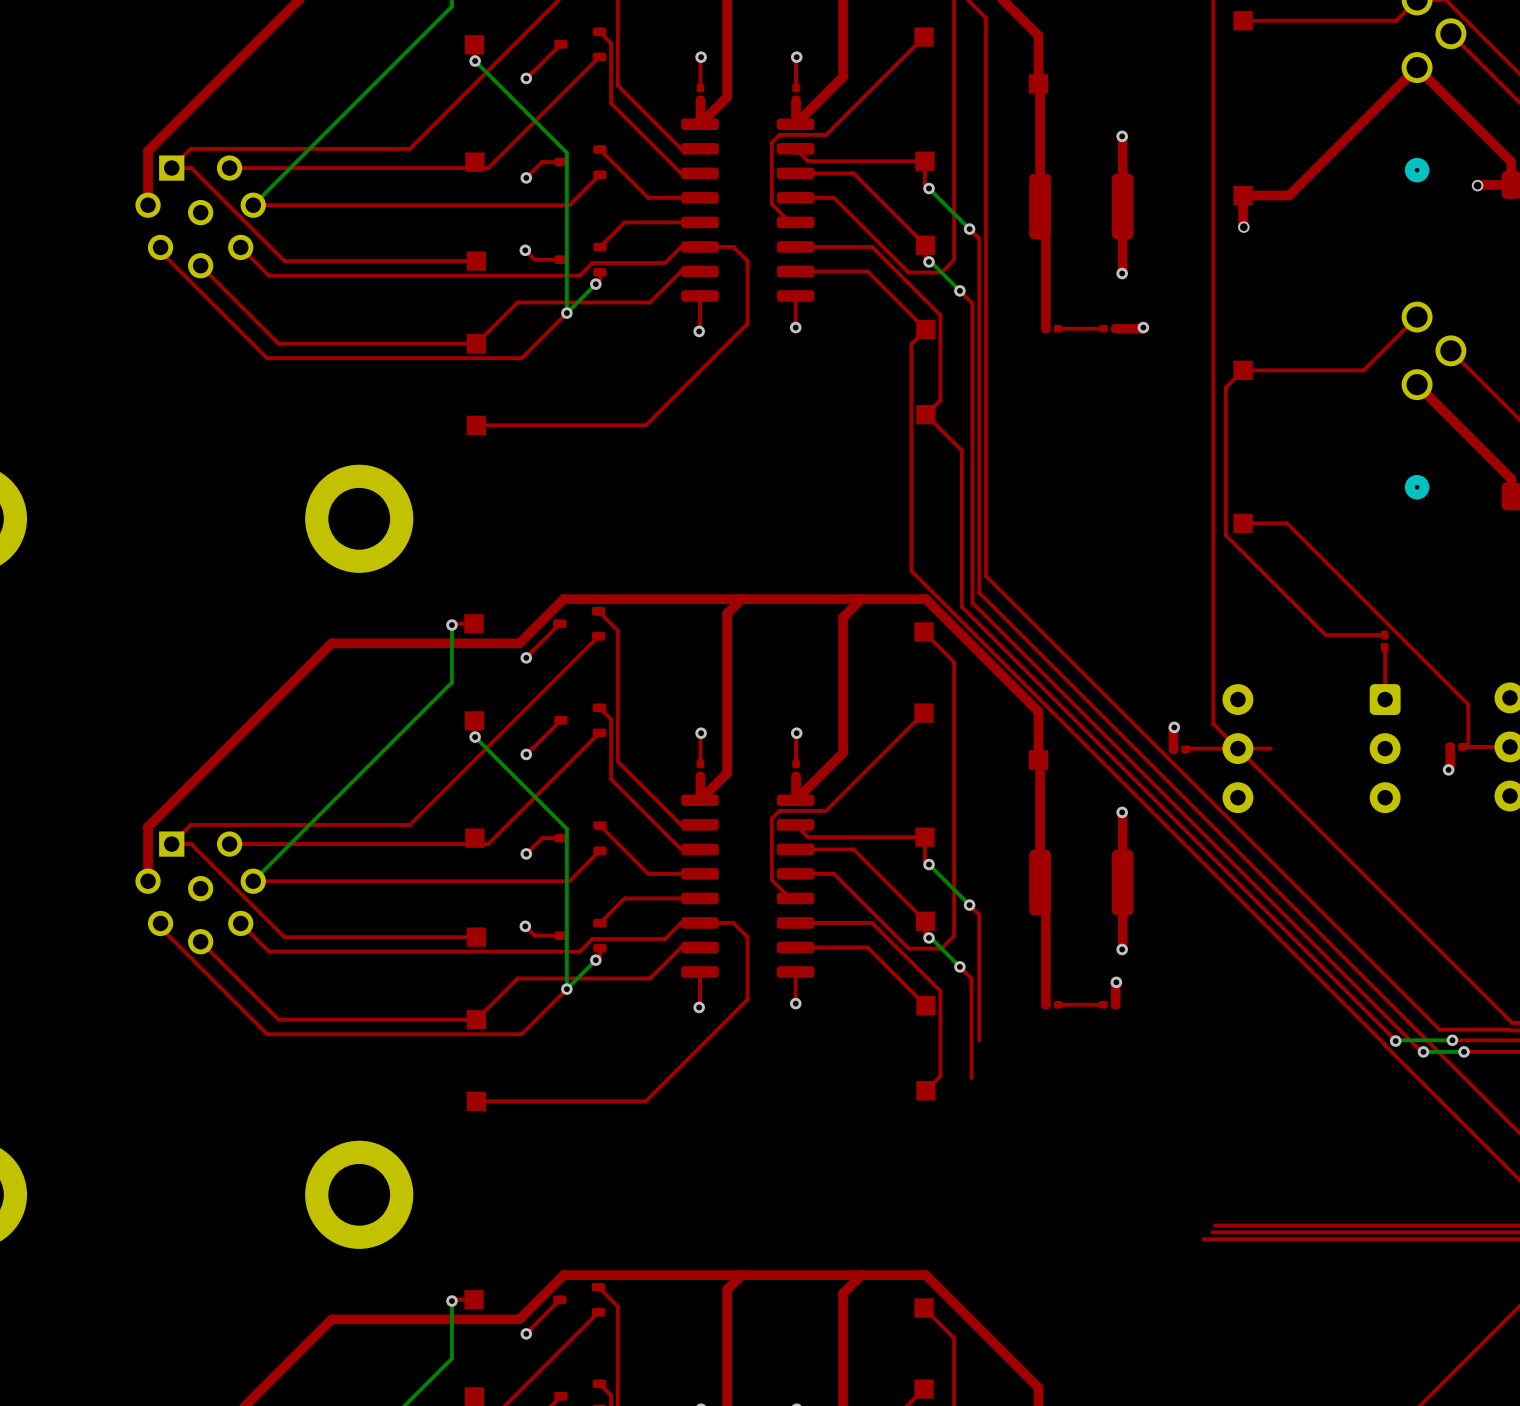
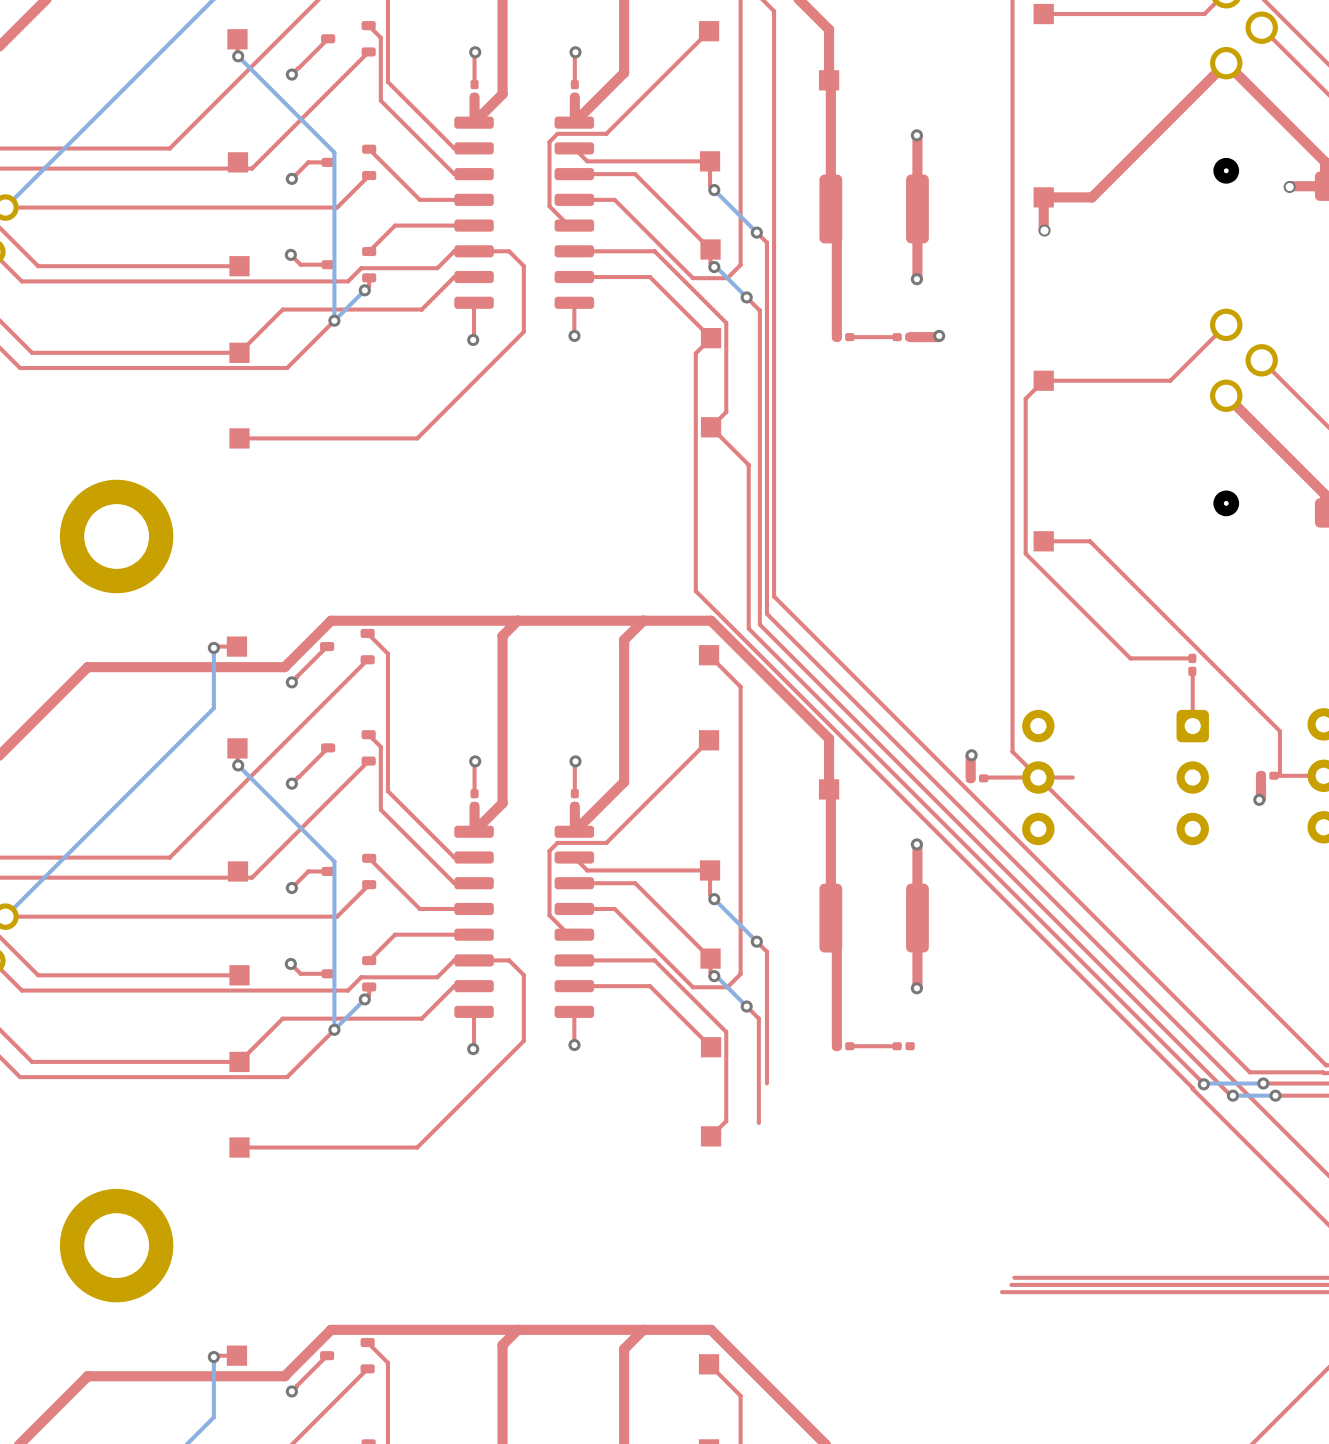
top track: (1116, 982) (1115, 1004) -> none
via: (1116, 982) -> none

